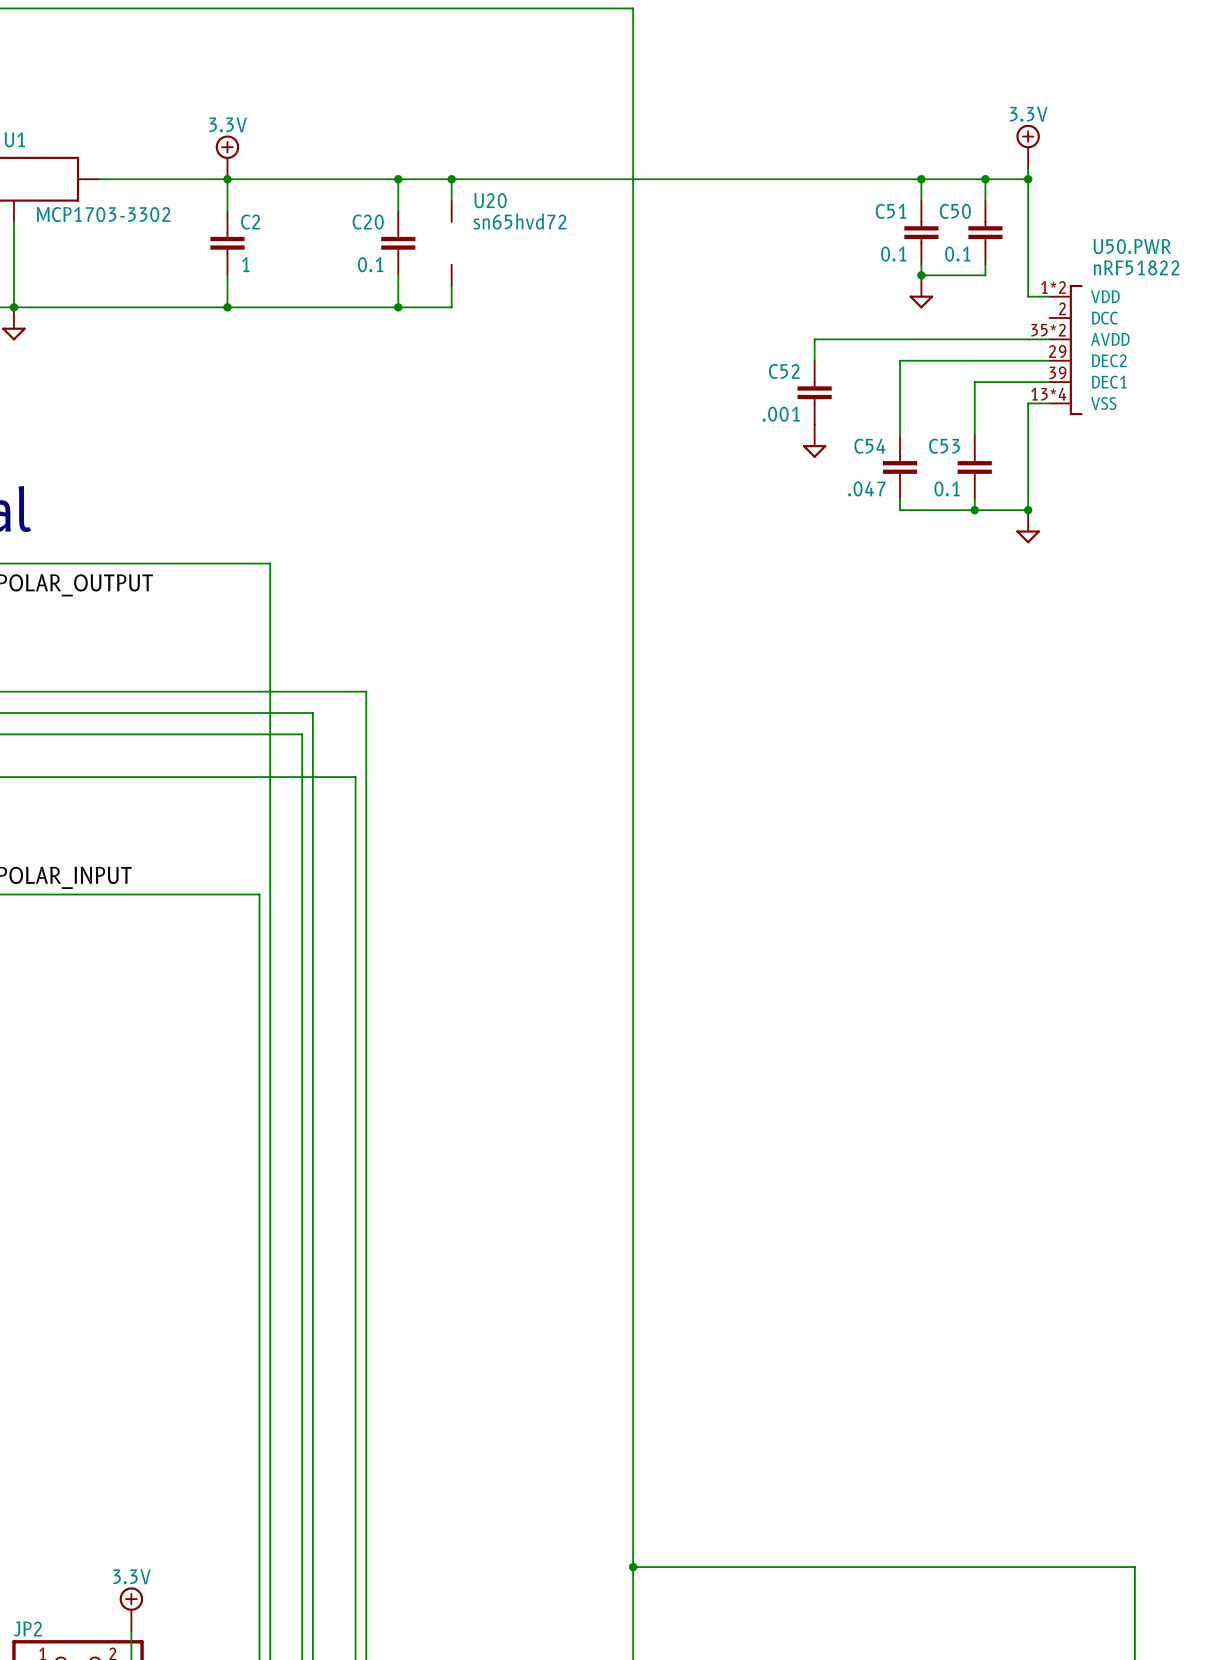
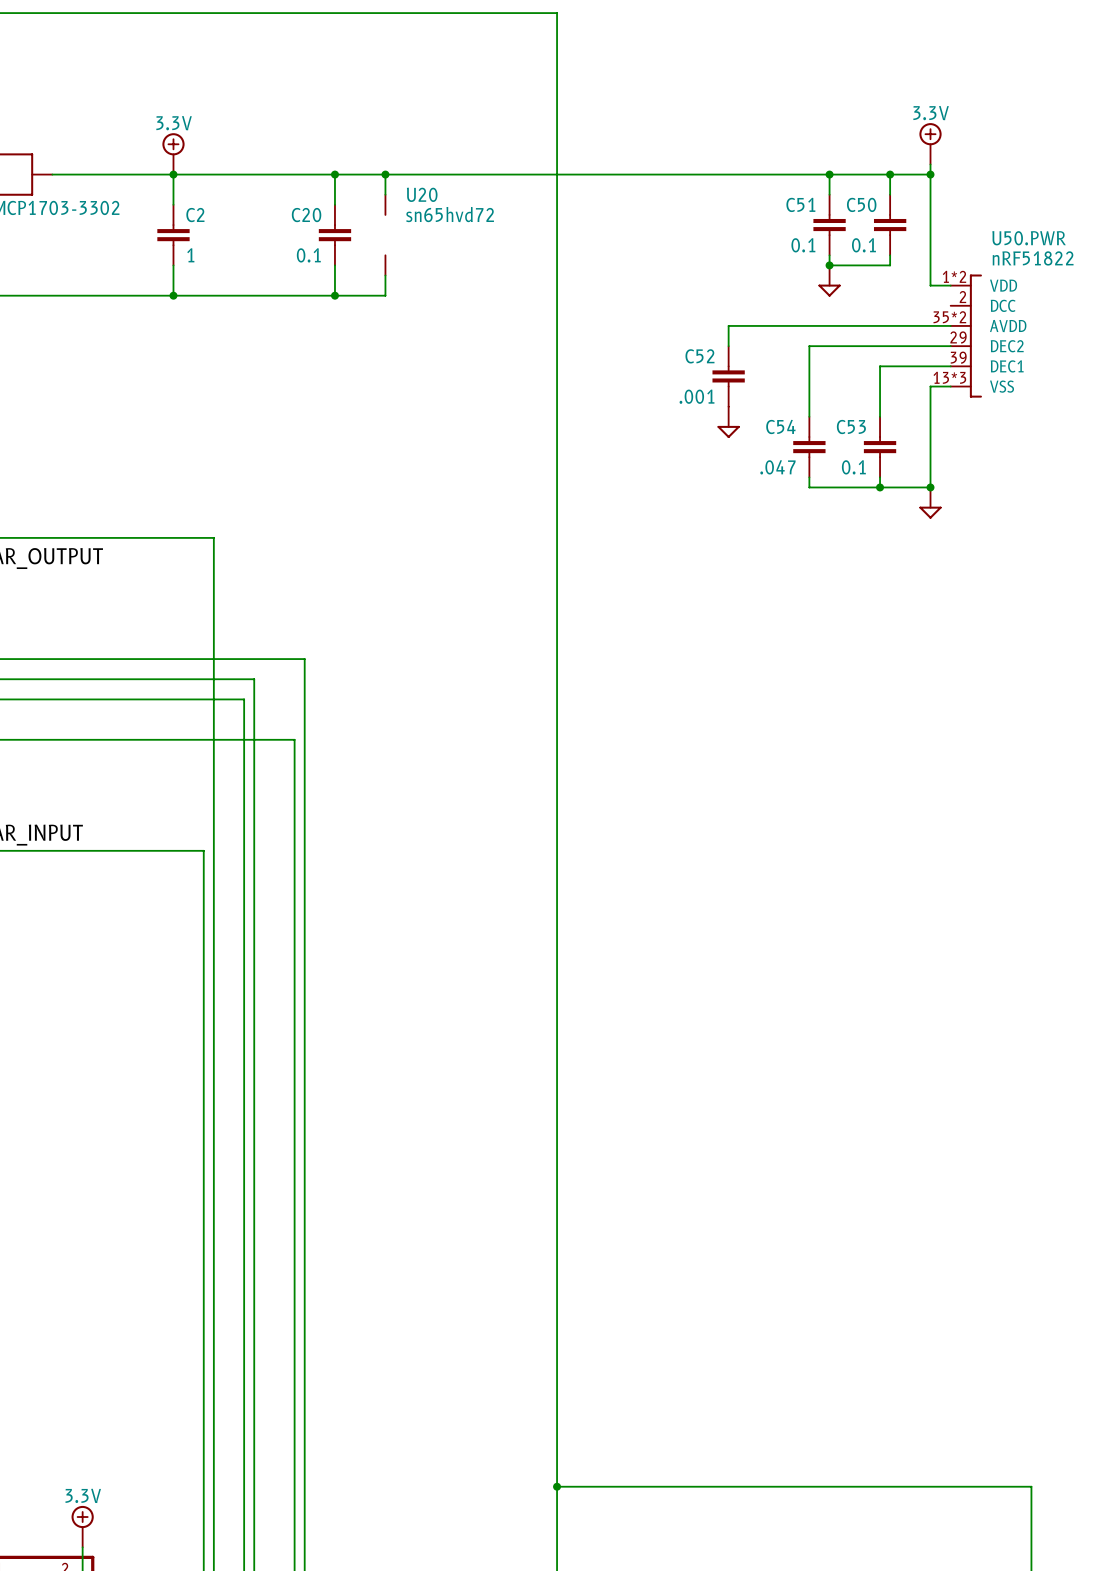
U50.PWR pin number: 13*4 (1048, 394) -> 13*3 (949, 377)

